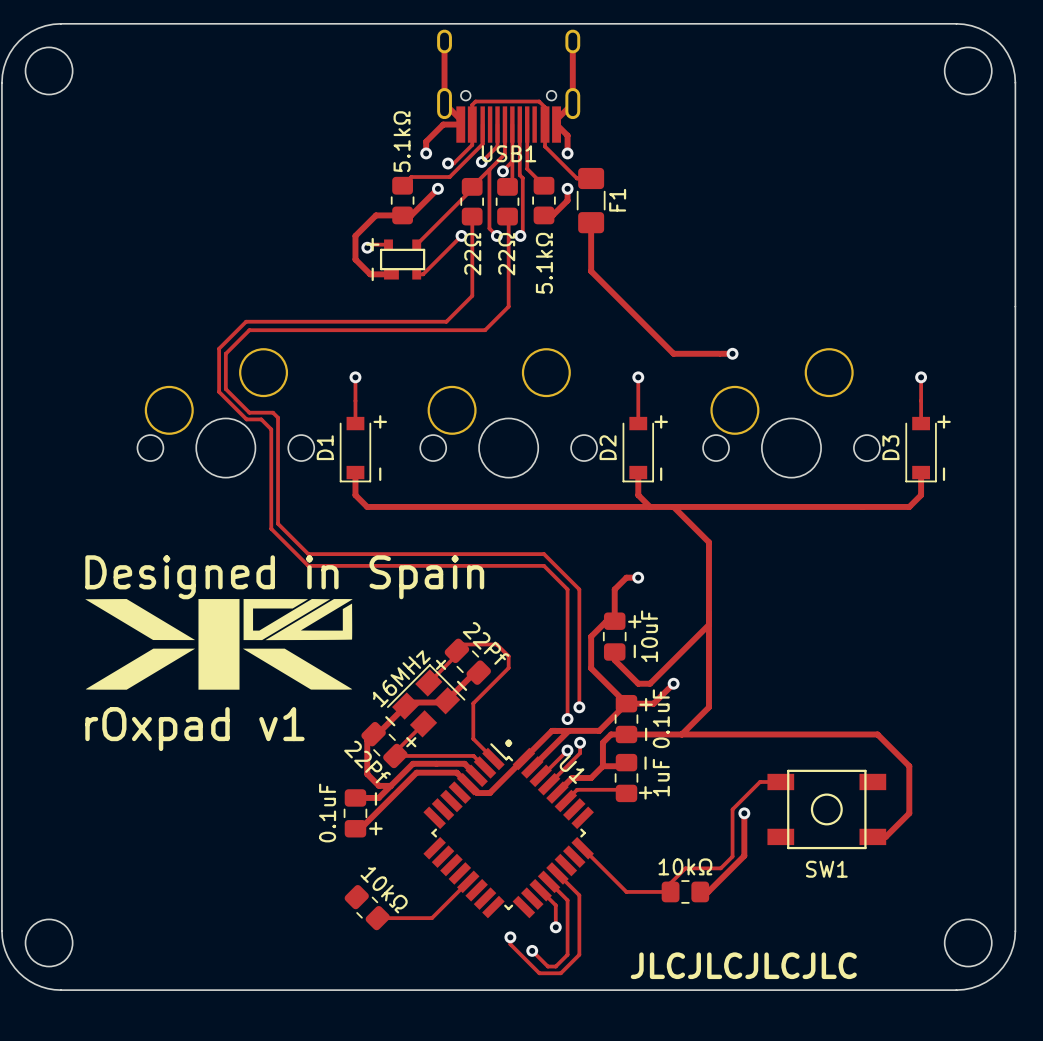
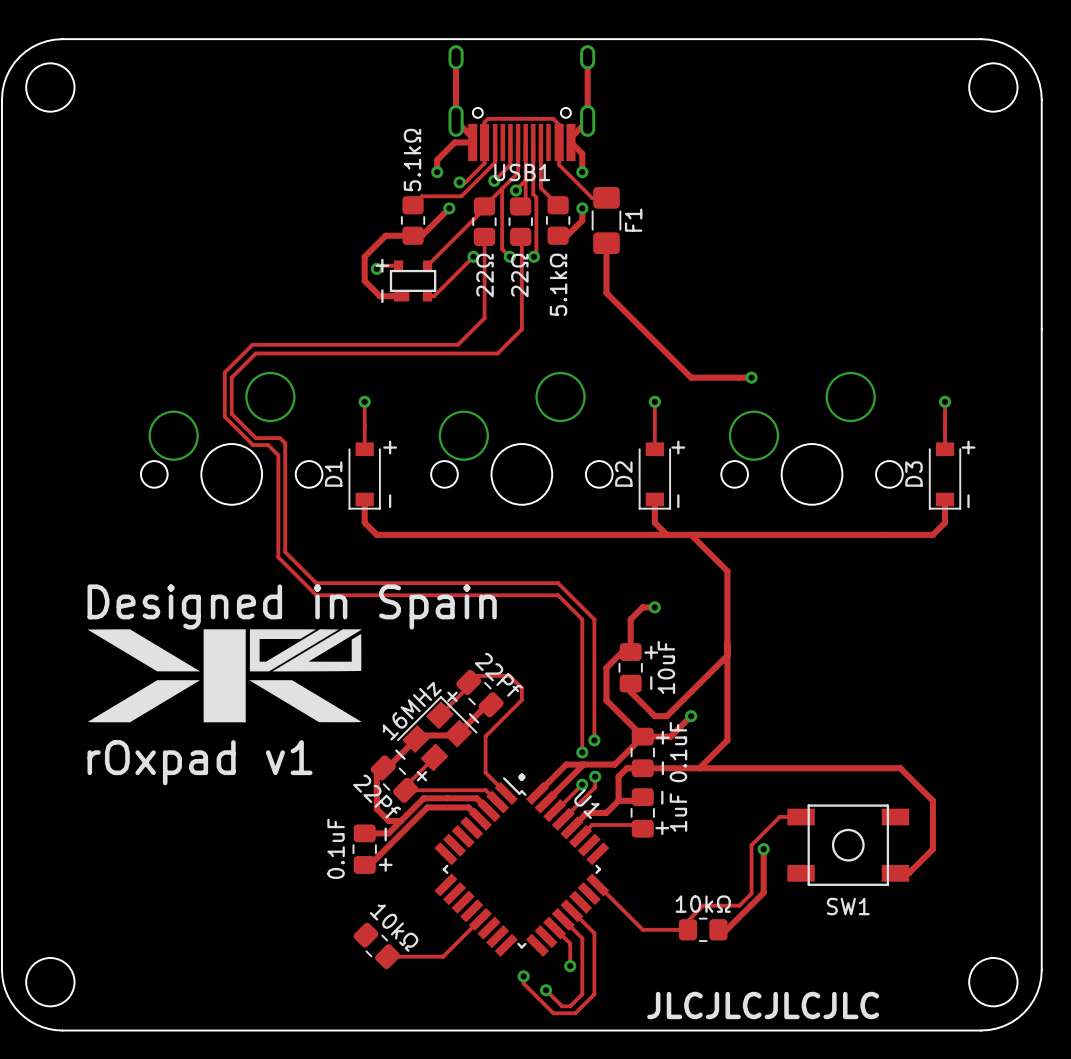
track: (523, 759) (489, 793) (477, 793) (468, 784) -> none

